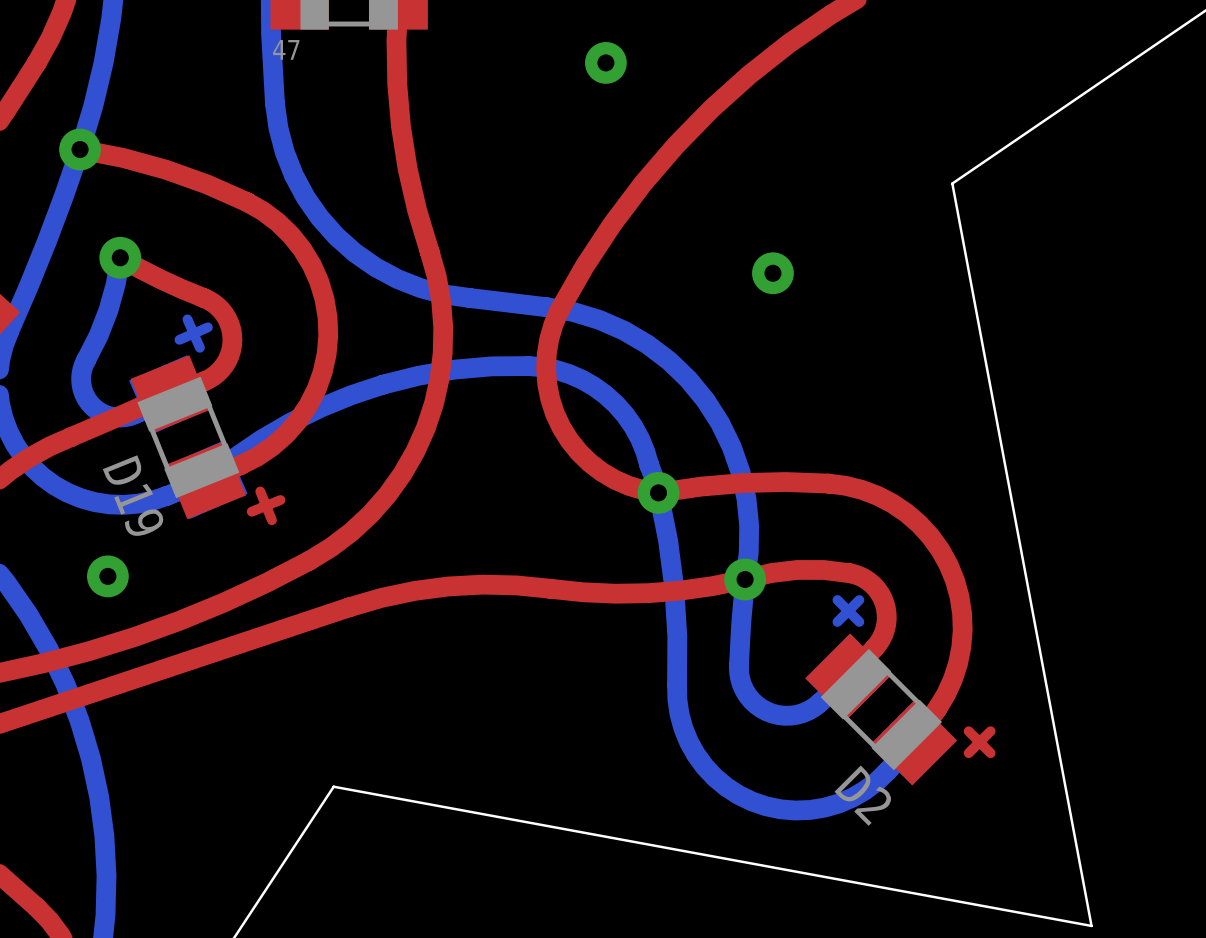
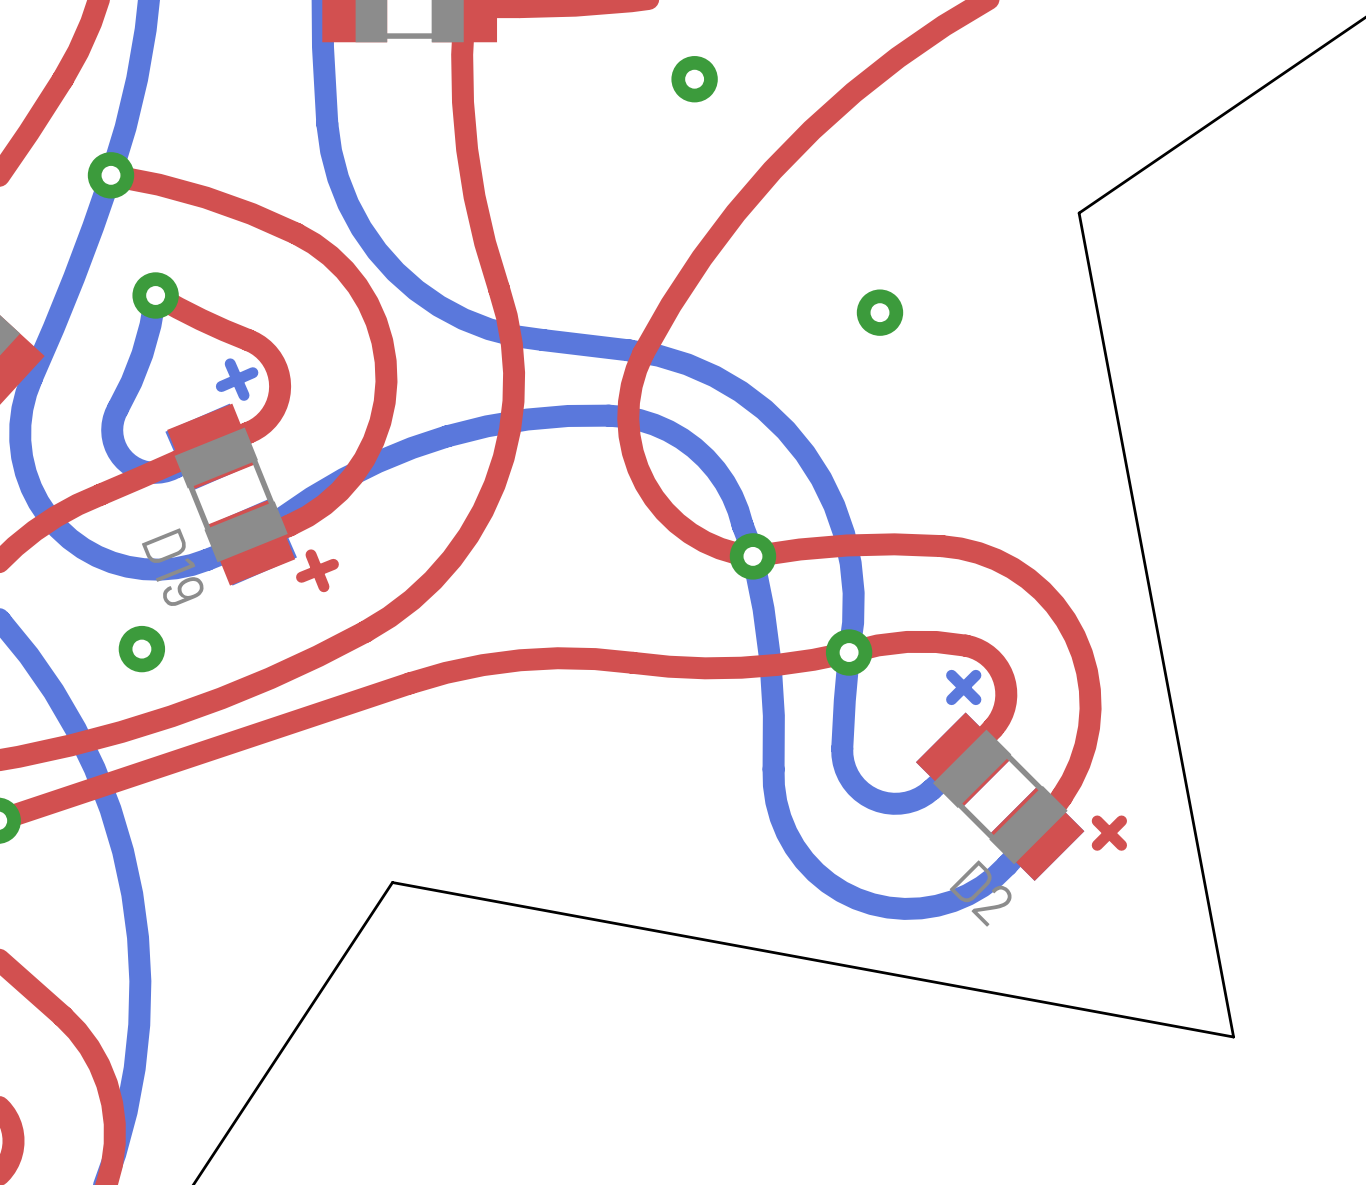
part value: 47 (286, 49) -> none

